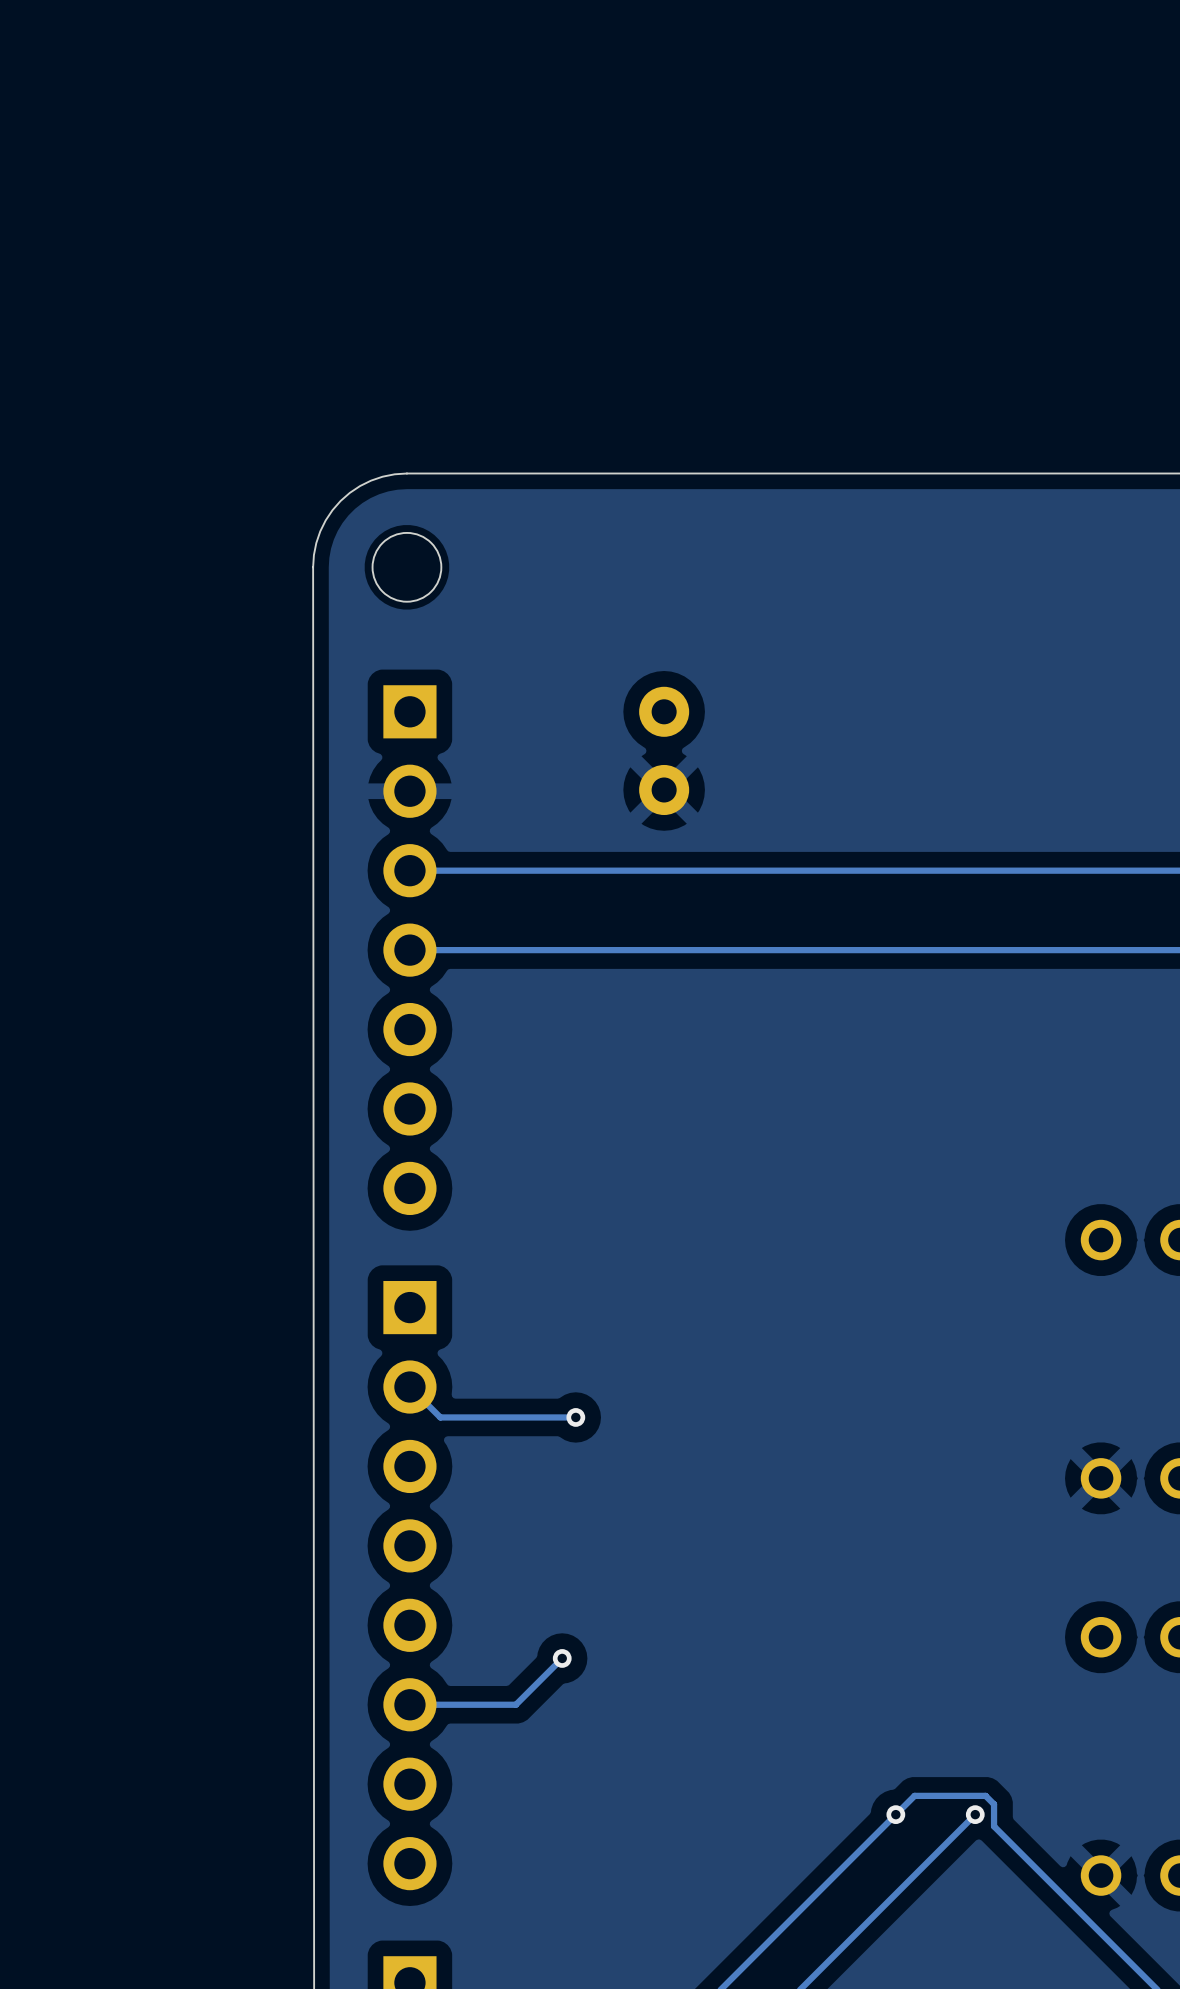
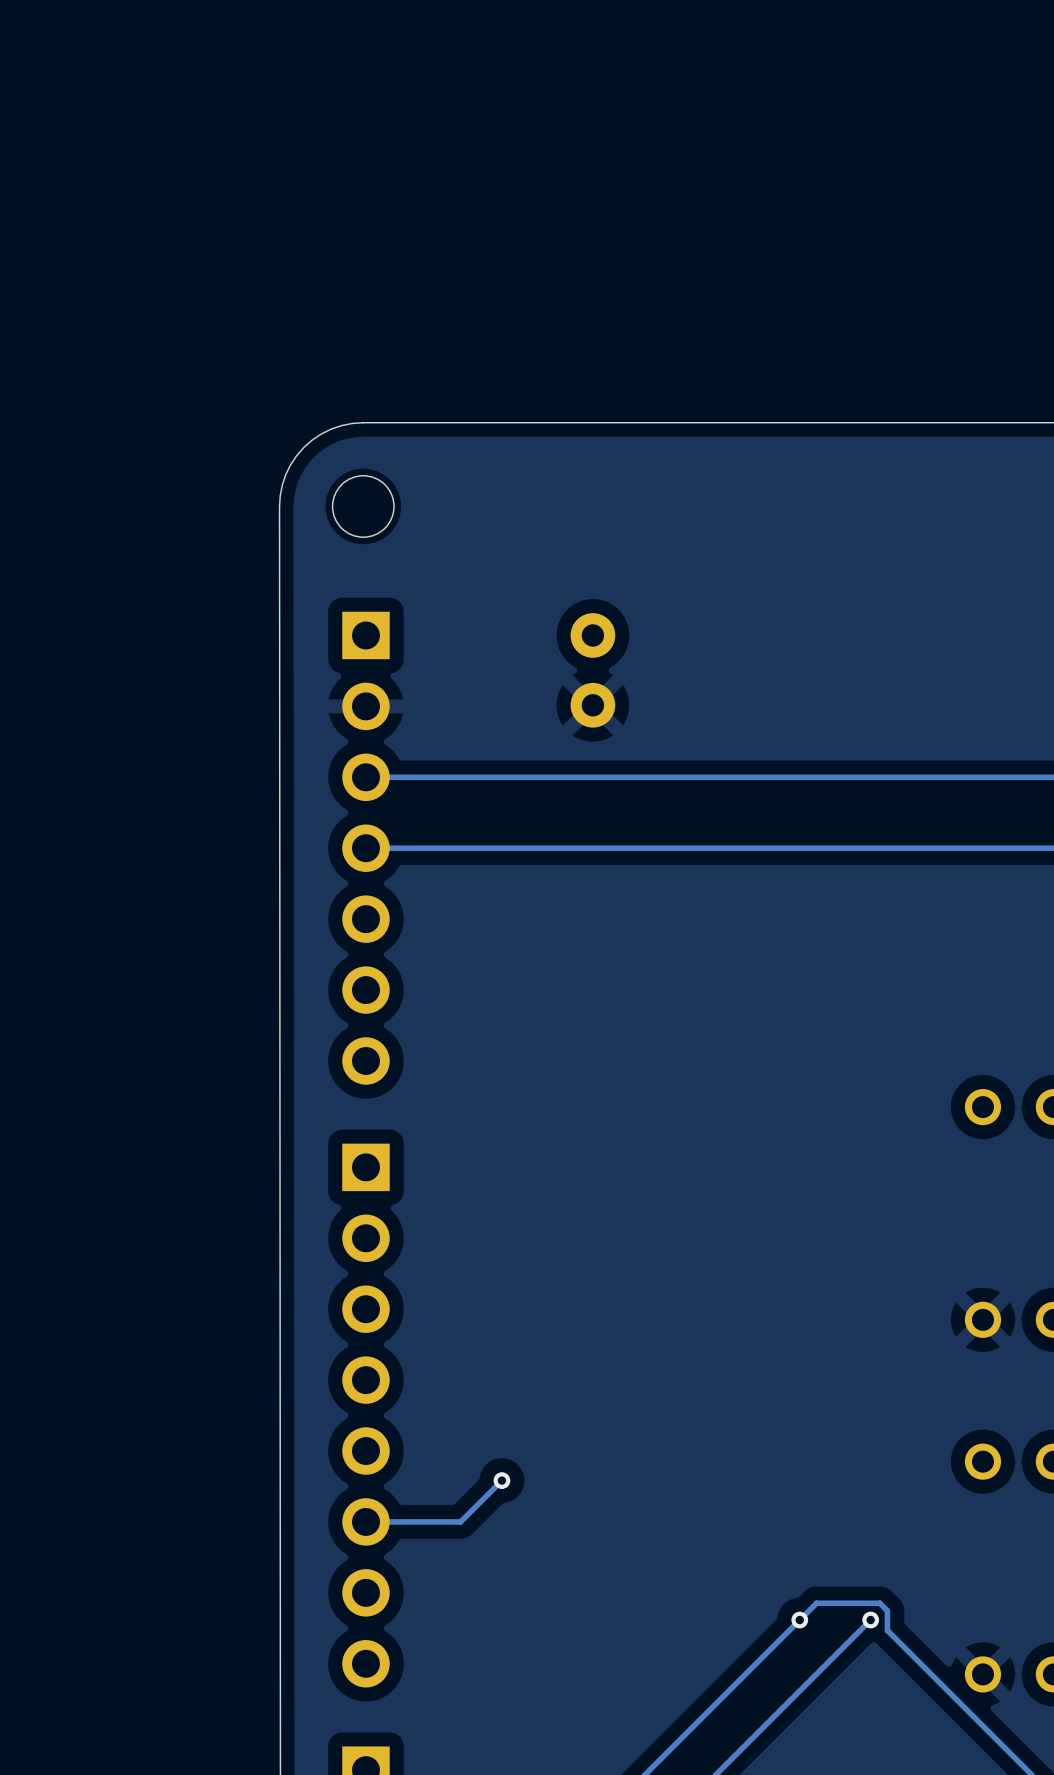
track: (409, 1387) (440, 1417) (575, 1417) -> none
via: (575, 1417) -> none

